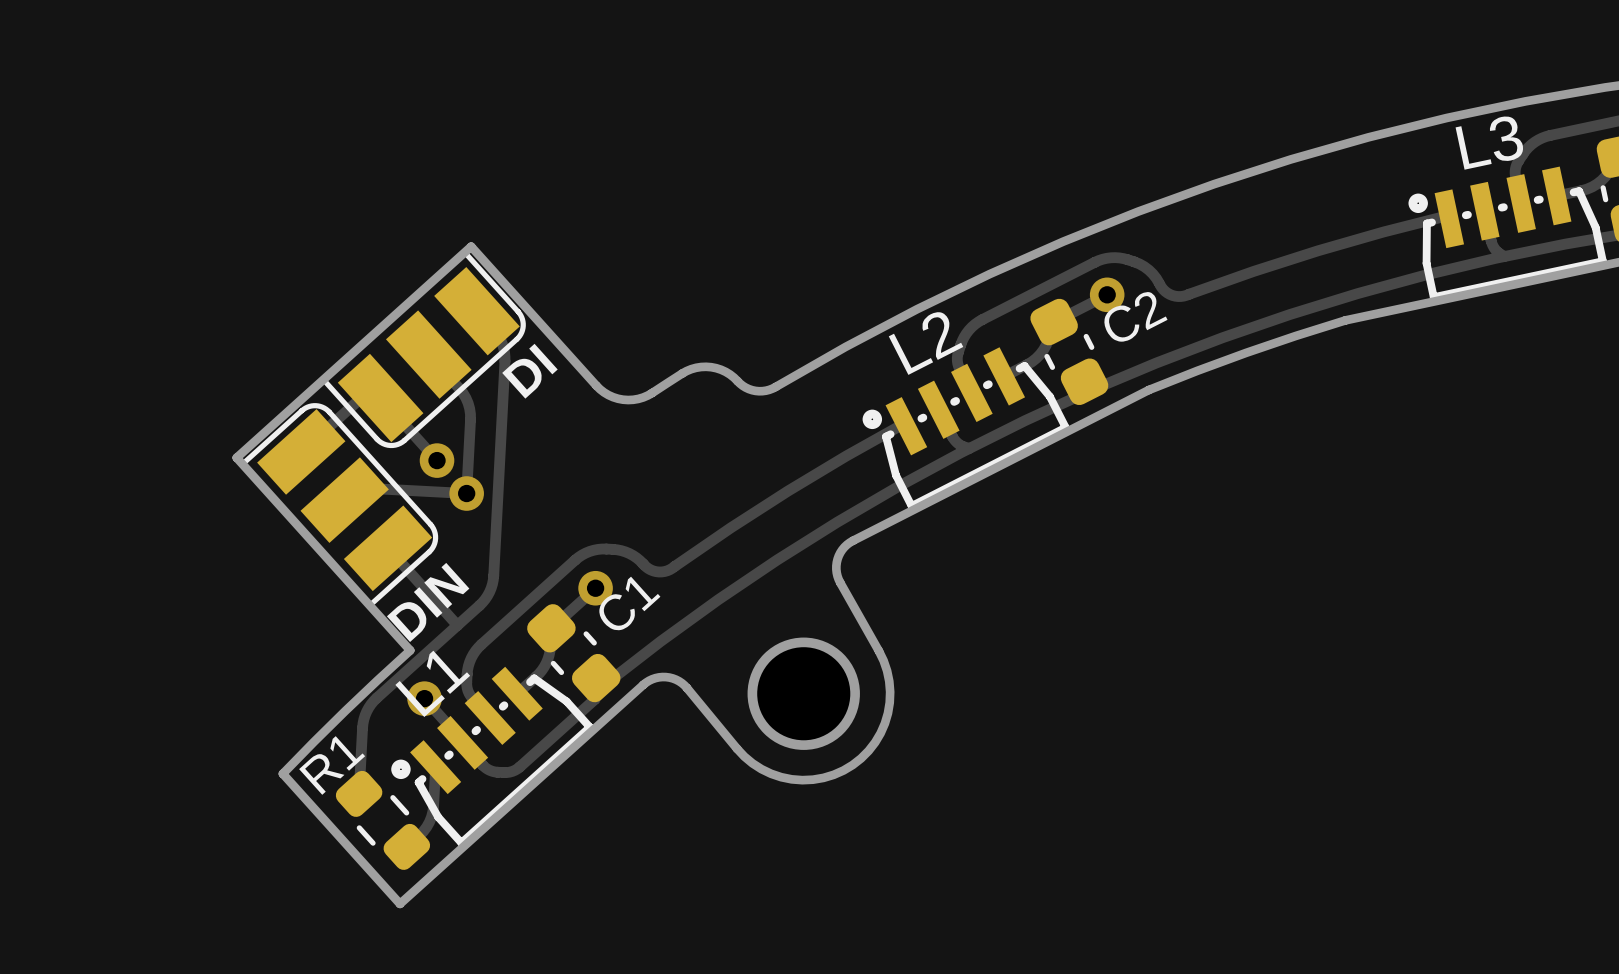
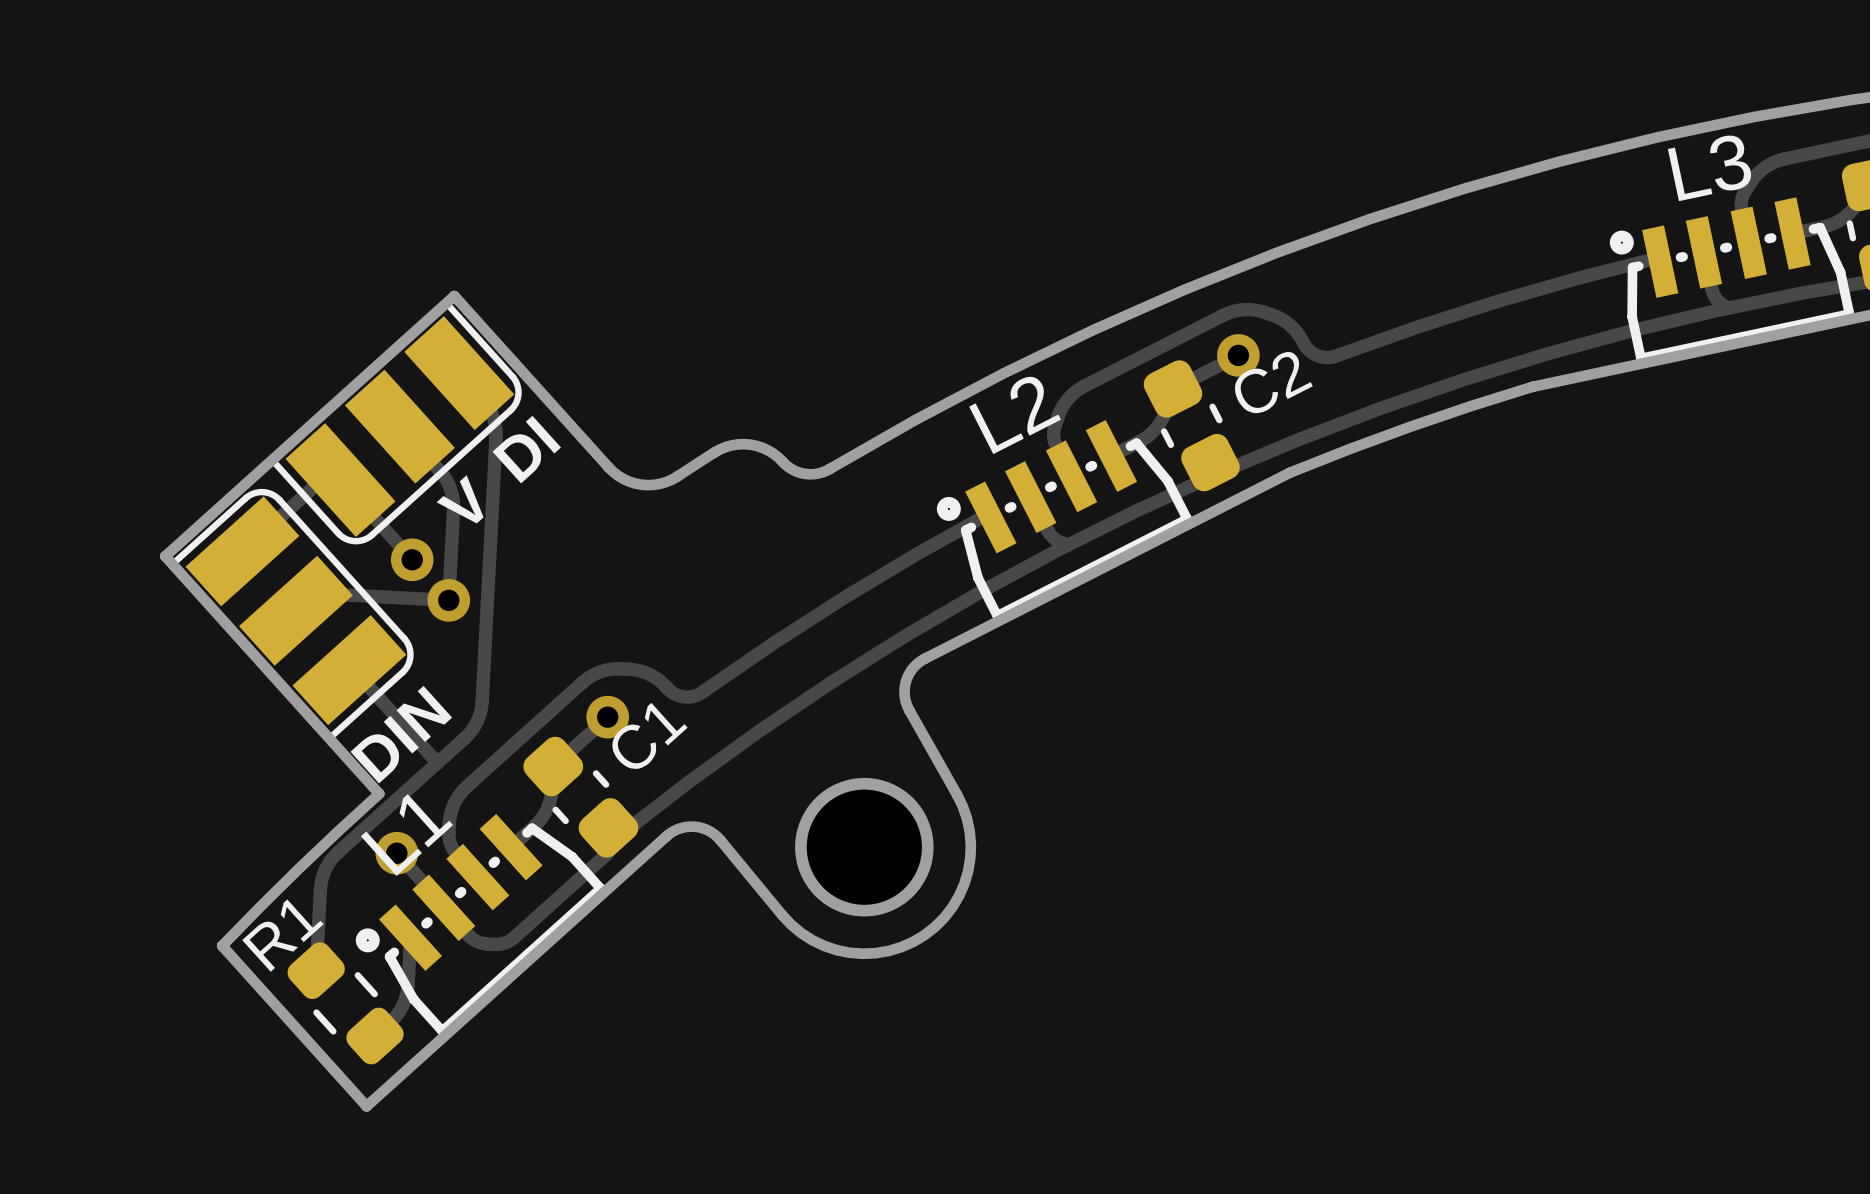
part footprint: [323, 253, 526, 449] -> [272, 303, 522, 545]
part footprint: [243, 403, 439, 606] -> [173, 488, 414, 739]
text: none -> V (460, 499)

